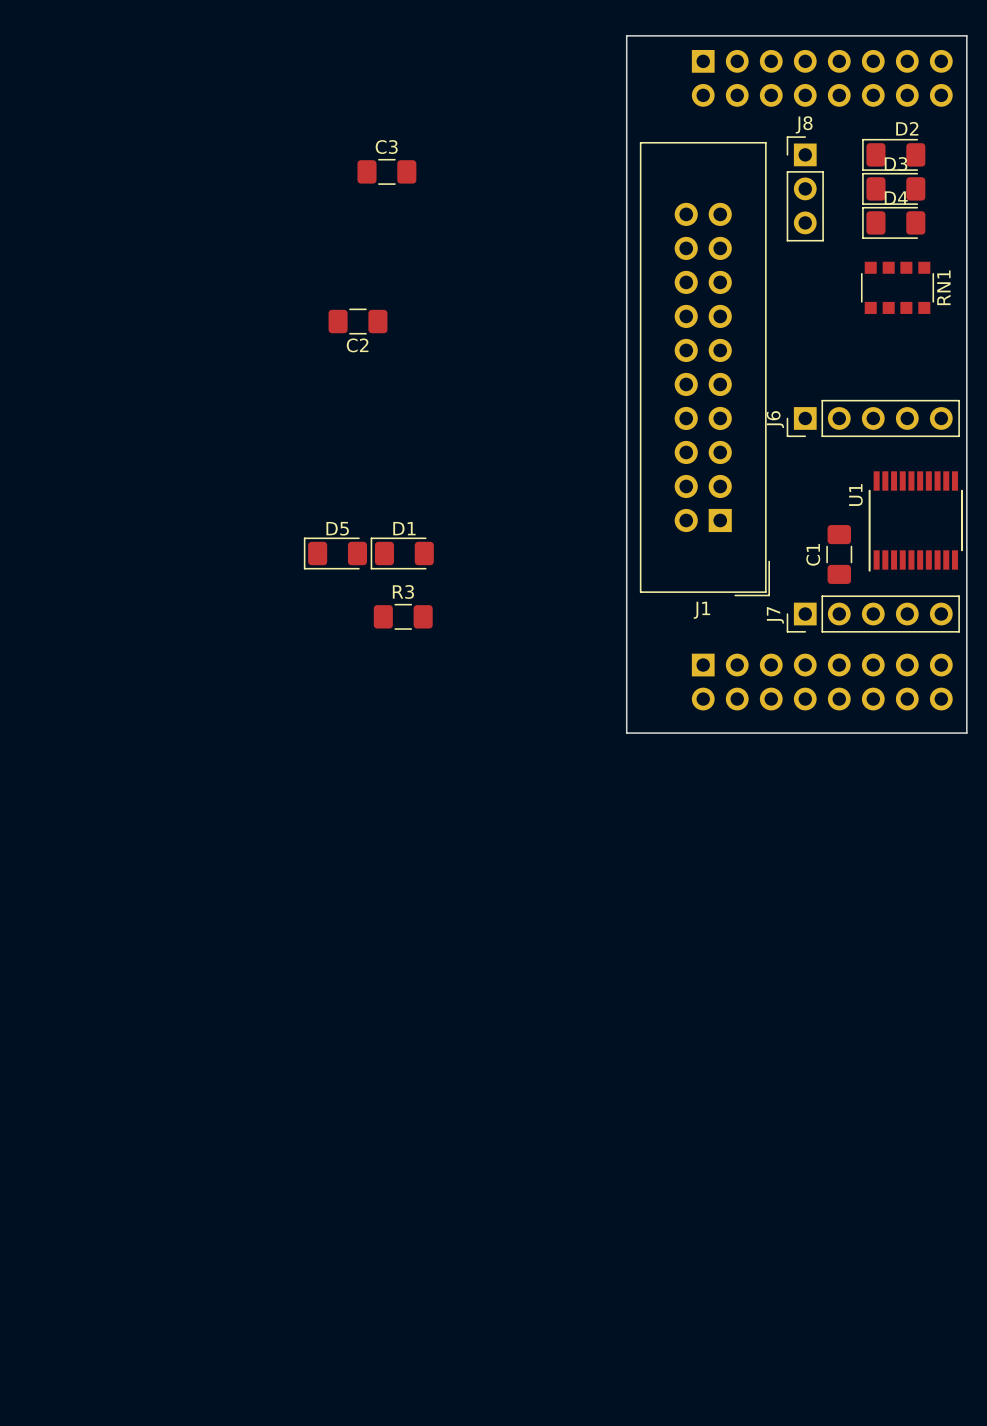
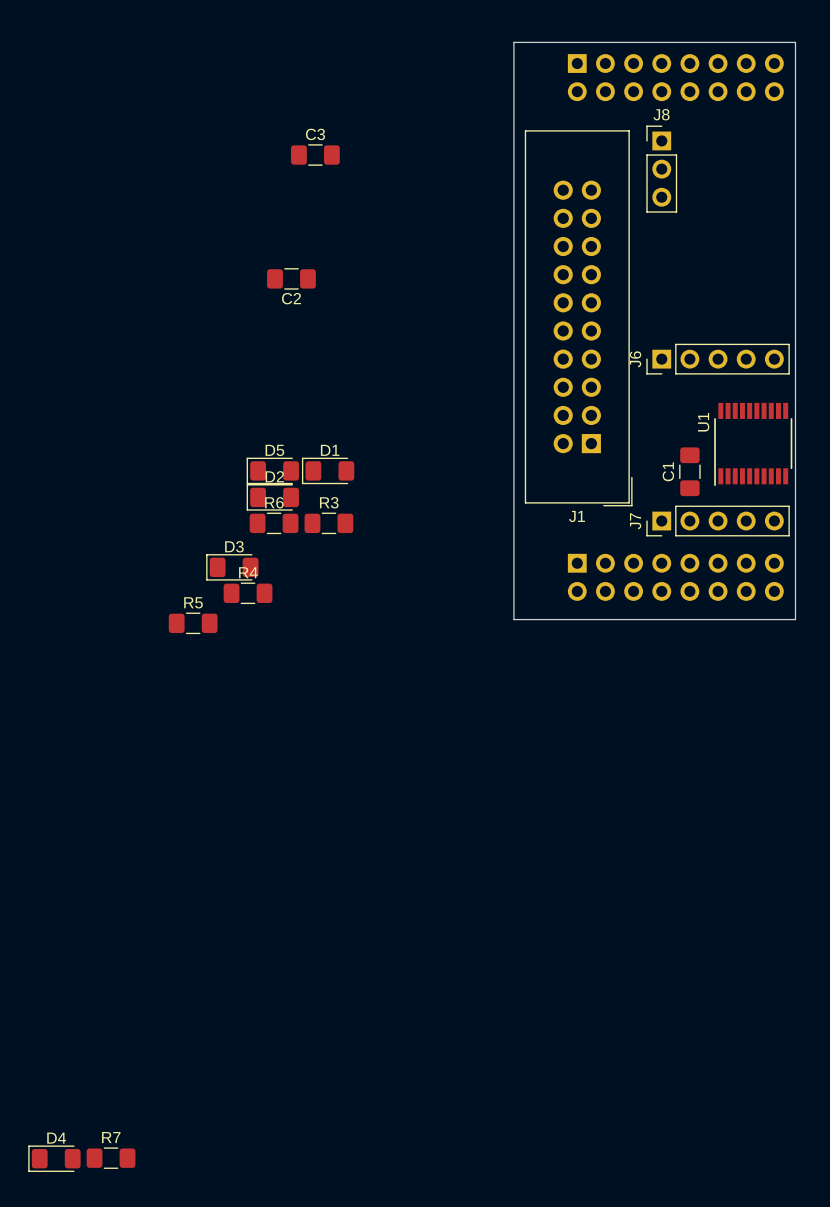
D2 name position: D2 (907, 128) -> D2 (274, 476)
D2 position: (893, 154) -> (272, 497)
D3 position: (893, 188) -> (232, 567)
D4 position: (893, 222) -> (54, 1158)
RN1: (897, 287) -> none
R6: none -> (274, 523)
R4: none -> (248, 593)
R5: none -> (193, 623)
R7: none -> (111, 1158)

